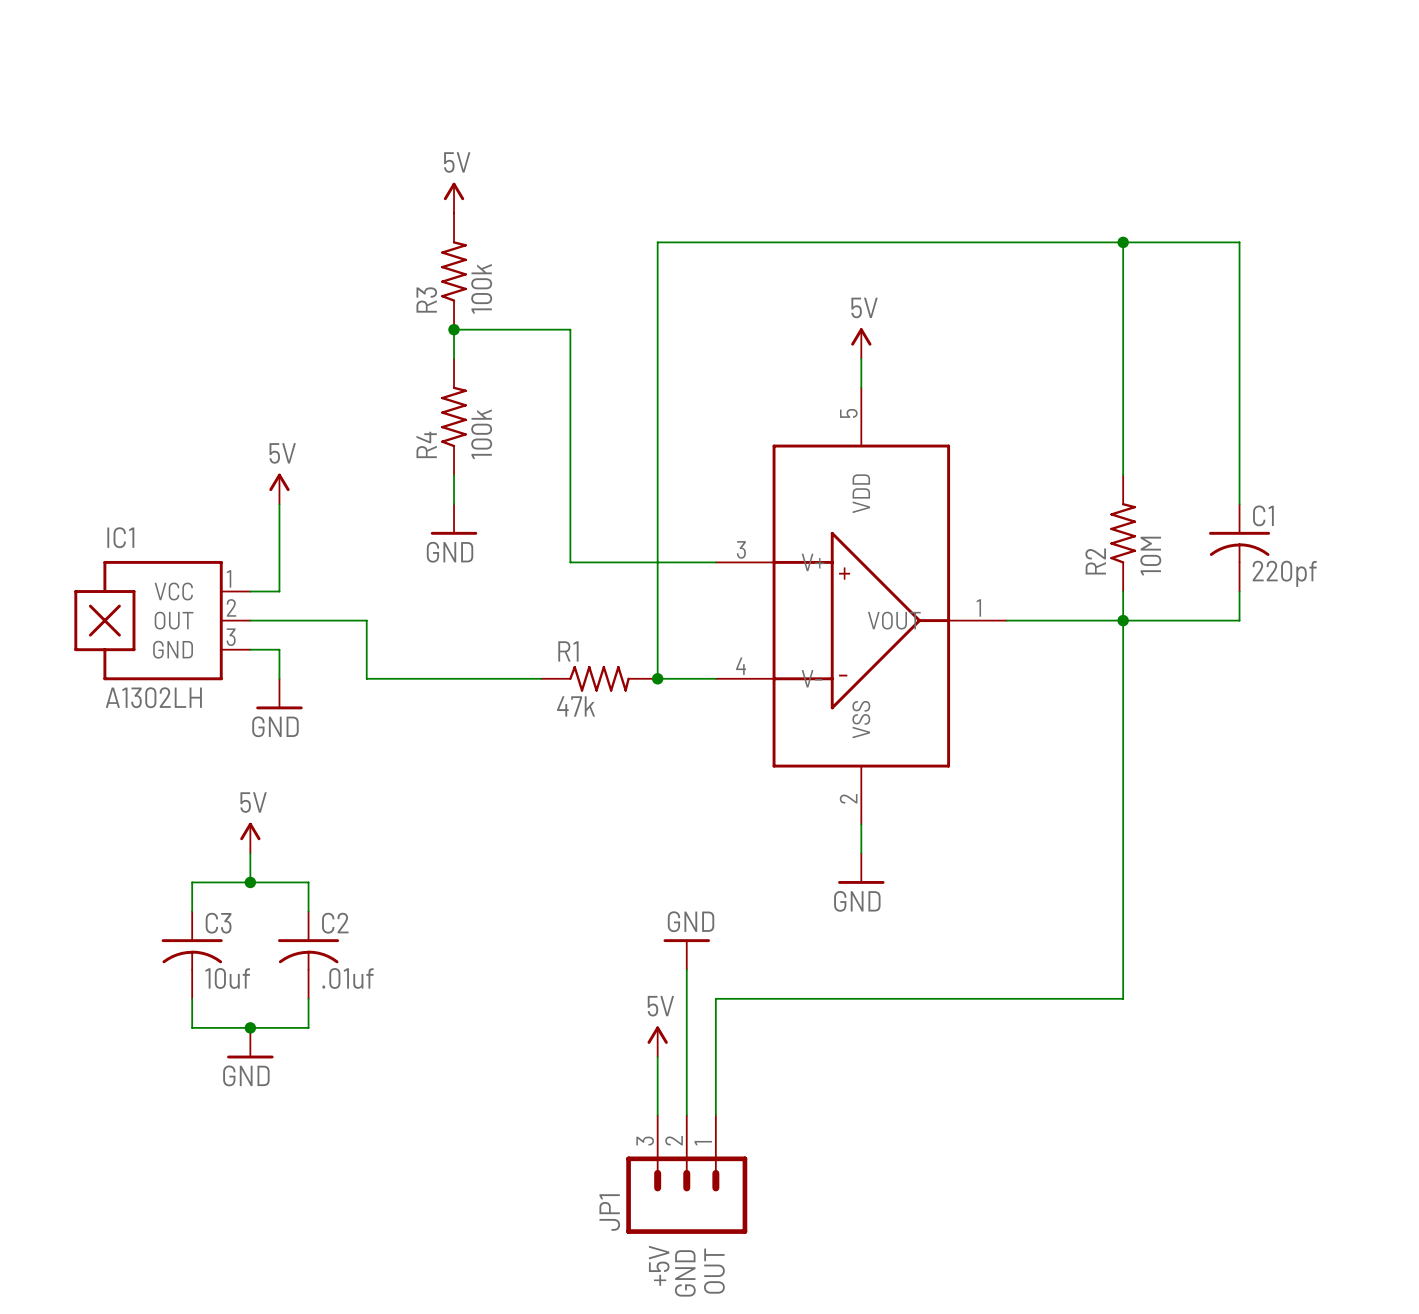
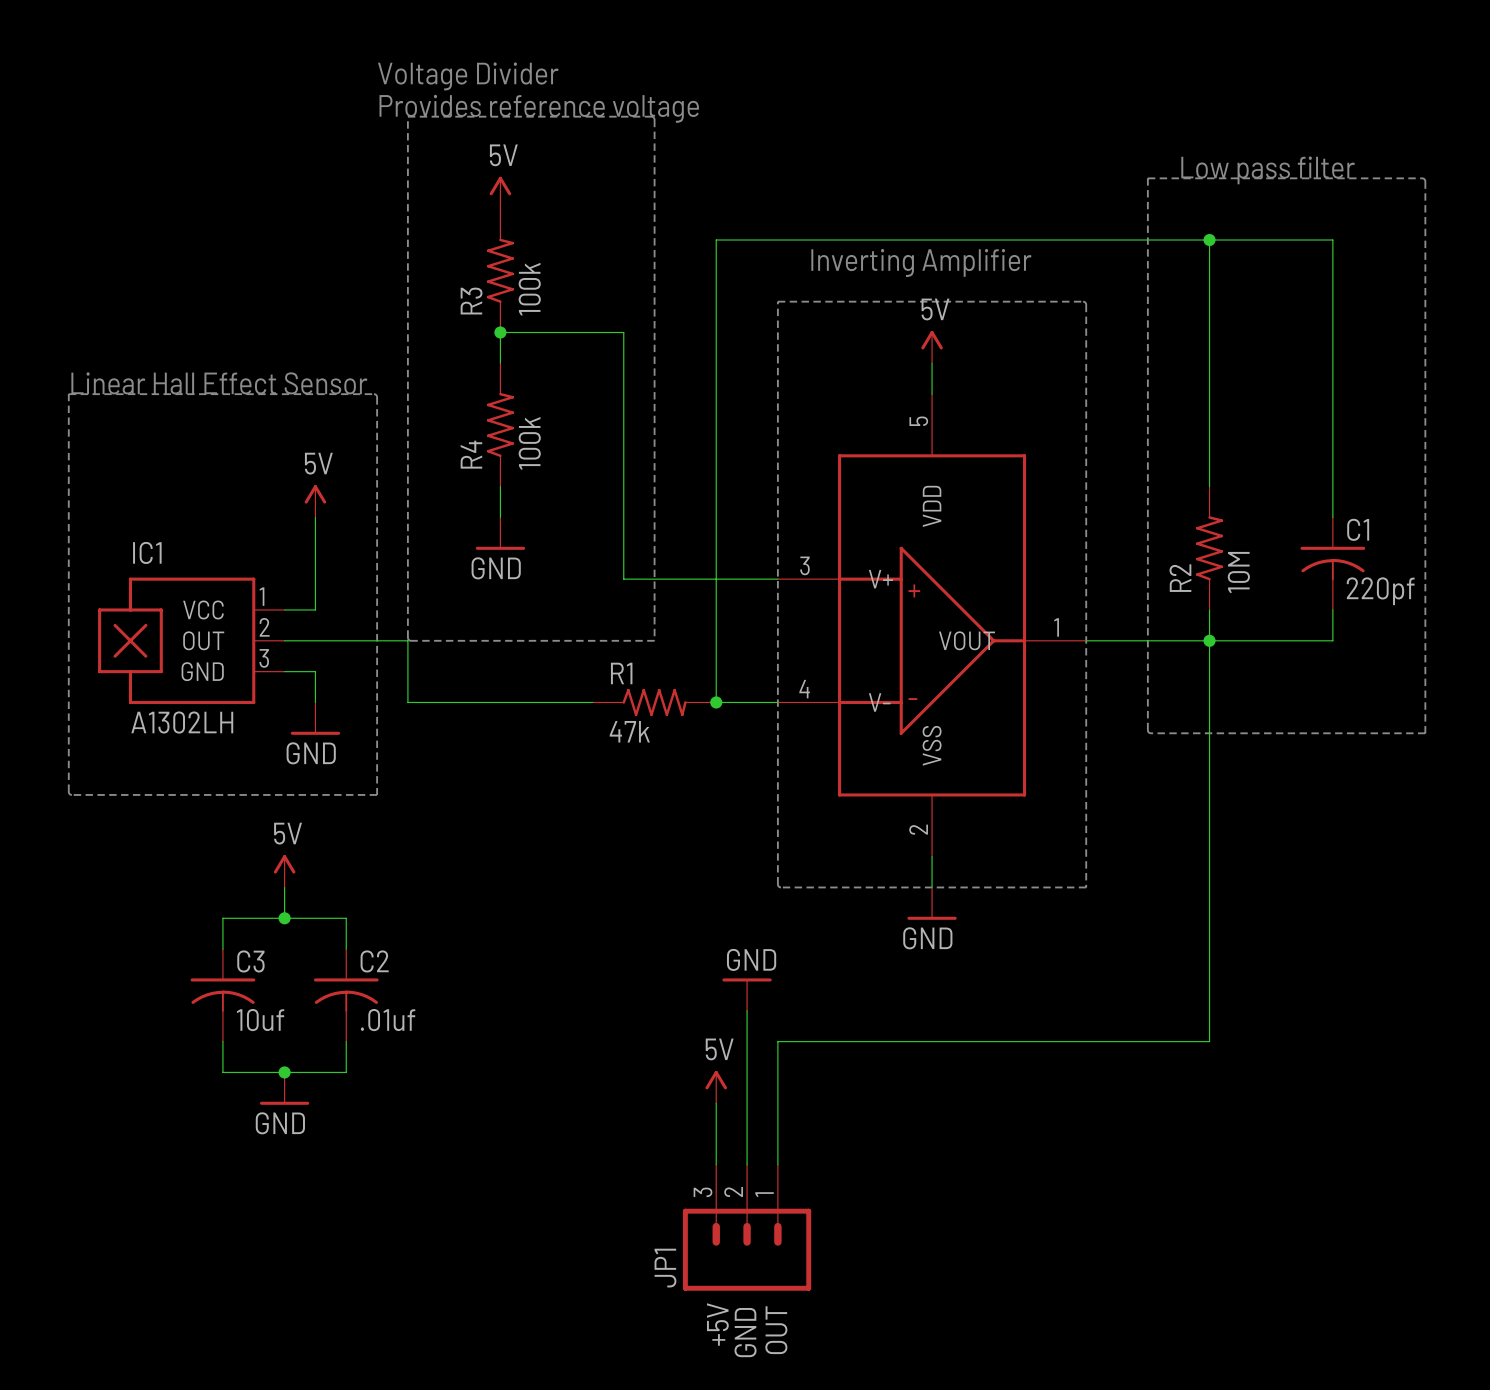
text: none -> Voltage Divider (468, 76)
text: none -> Provides reference voltage (539, 108)
line: none -> (407, 116) (651, 116) (654, 118) (654, 640) (411, 640) (408, 638) (407, 116)
text: none -> Low pass filter (1268, 170)
line: none -> (1147, 178) (1422, 178) (1424, 179) (1425, 733) (1150, 733) (1148, 731) (1147, 178)
text: none -> Inverting Amplifier (921, 262)
line: none -> (777, 301) (1083, 301) (1085, 303) (1086, 887) (780, 887) (778, 885) (777, 301)
text: none -> Linear Hall Effect Sensor (219, 383)
line: none -> (68, 394) (376, 395) (377, 794) (69, 793) (68, 394)

